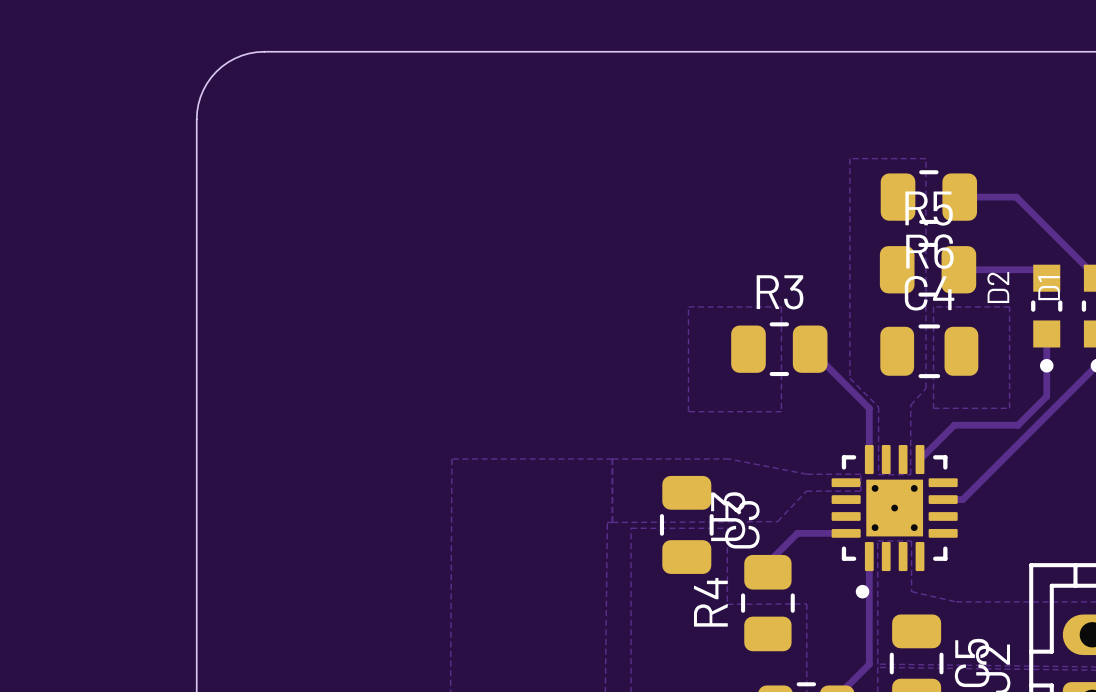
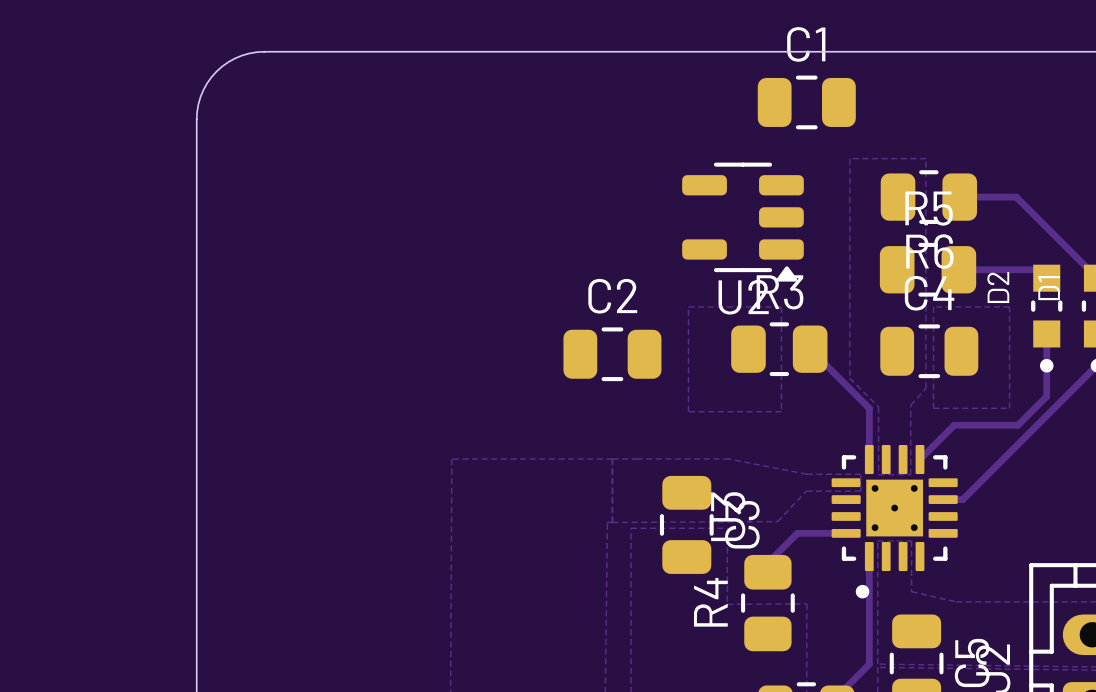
C1: none -> (806, 102)
U2: none -> (742, 222)
C2: none -> (612, 354)

